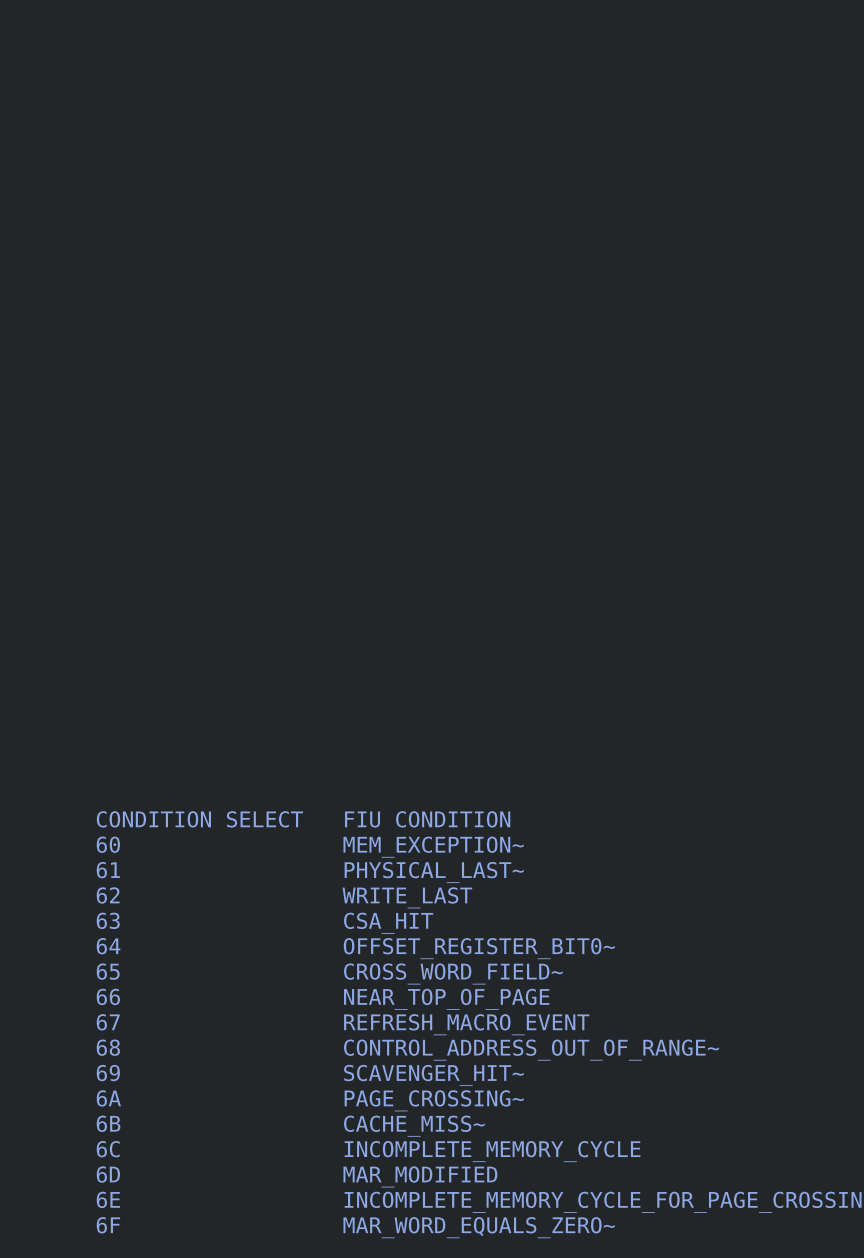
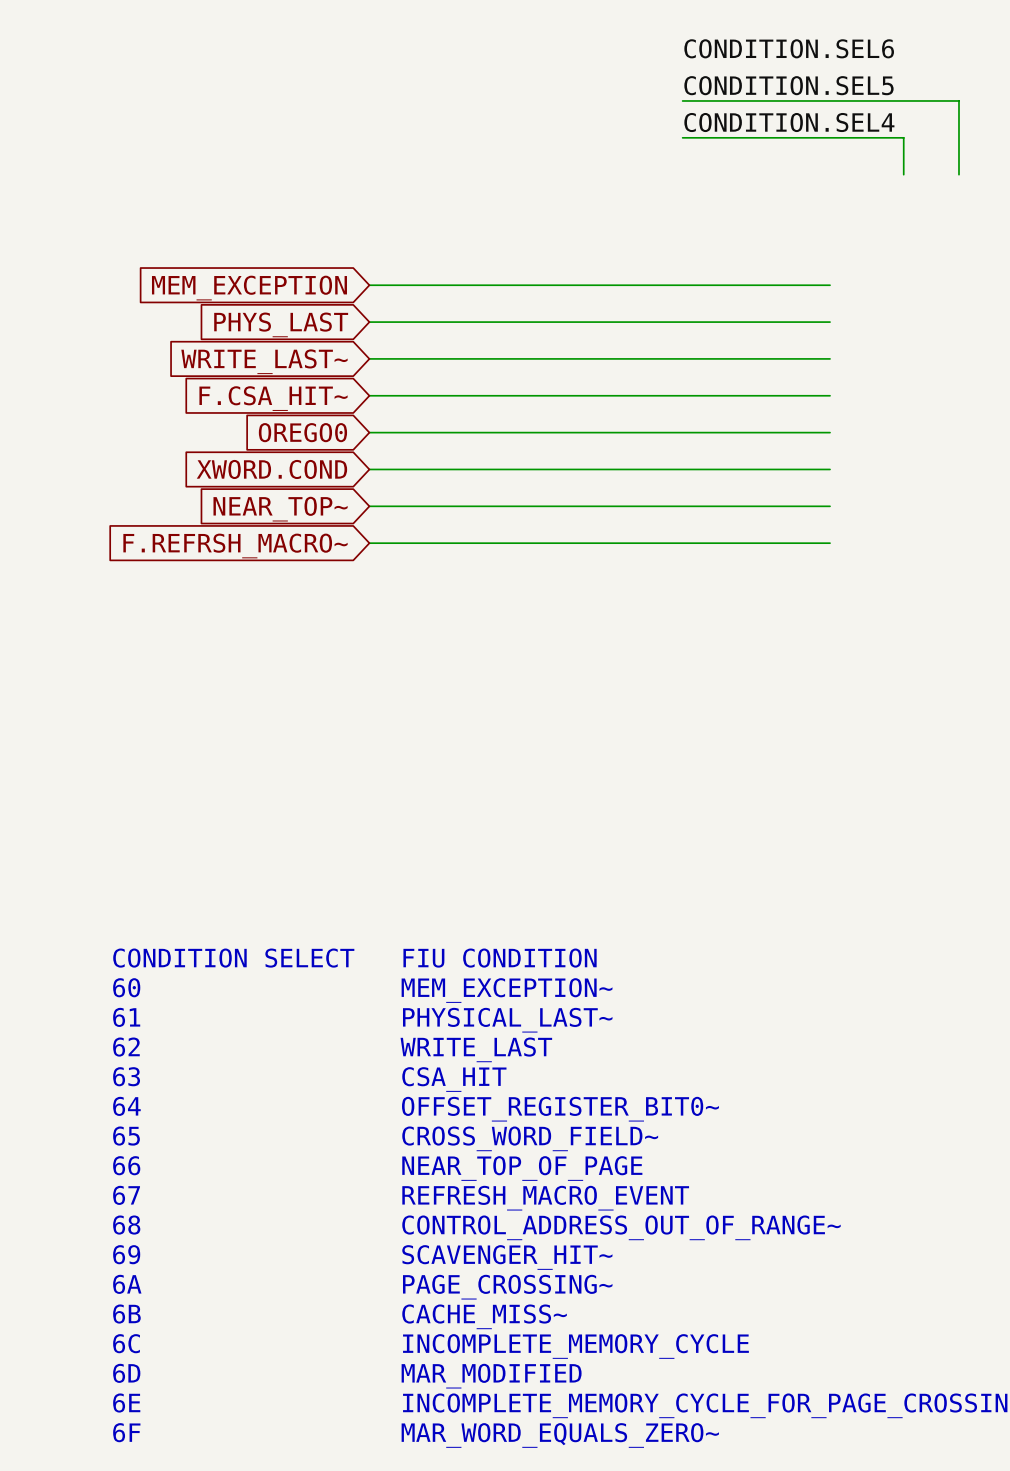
label: none -> CONDITION.SEL6 (789, 48)
label: none -> CONDITION.SEL5 (788, 85)
wire: none -> (682, 100) (958, 100) (958, 174)
label: none -> CONDITION.SEL4 (789, 122)
wire: none -> (682, 137) (903, 137) (903, 174)
wire: none -> (369, 285) (830, 285)
global label: none -> MEM_EXCEPTION (249, 288)
wire: none -> (369, 322) (830, 322)
global label: none -> PHYS_LAST (281, 324)
wire: none -> (369, 358) (830, 358)
global label: none -> WRITE_LAST~ (264, 361)
wire: none -> (369, 395) (830, 395)
global label: none -> F.CSA_HIT~ (273, 398)
wire: none -> (369, 432) (830, 432)
global label: none -> OREGO0 (302, 432)
global label: none -> XWORD.COND (271, 469)
wire: none -> (369, 469) (830, 469)
wire: none -> (369, 506) (830, 506)
global label: none -> NEAR_TOP~ (280, 509)
wire: none -> (369, 543) (830, 543)
global label: none -> F.REFRSH_MACRO~ (235, 545)

